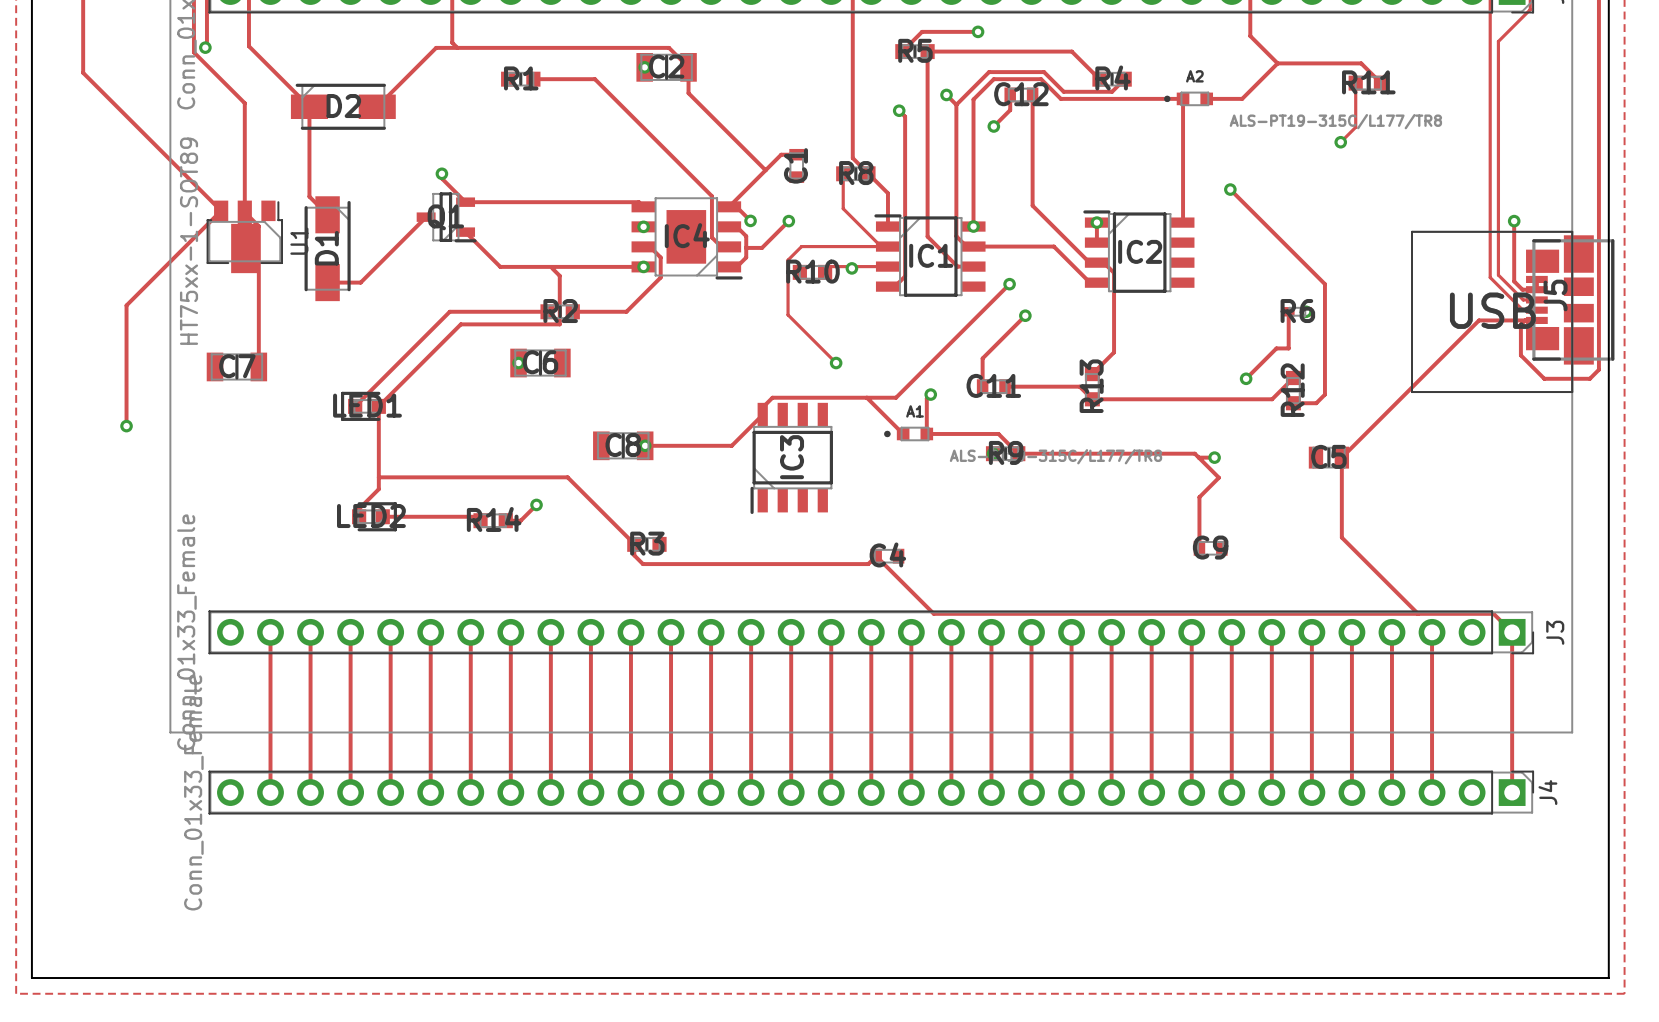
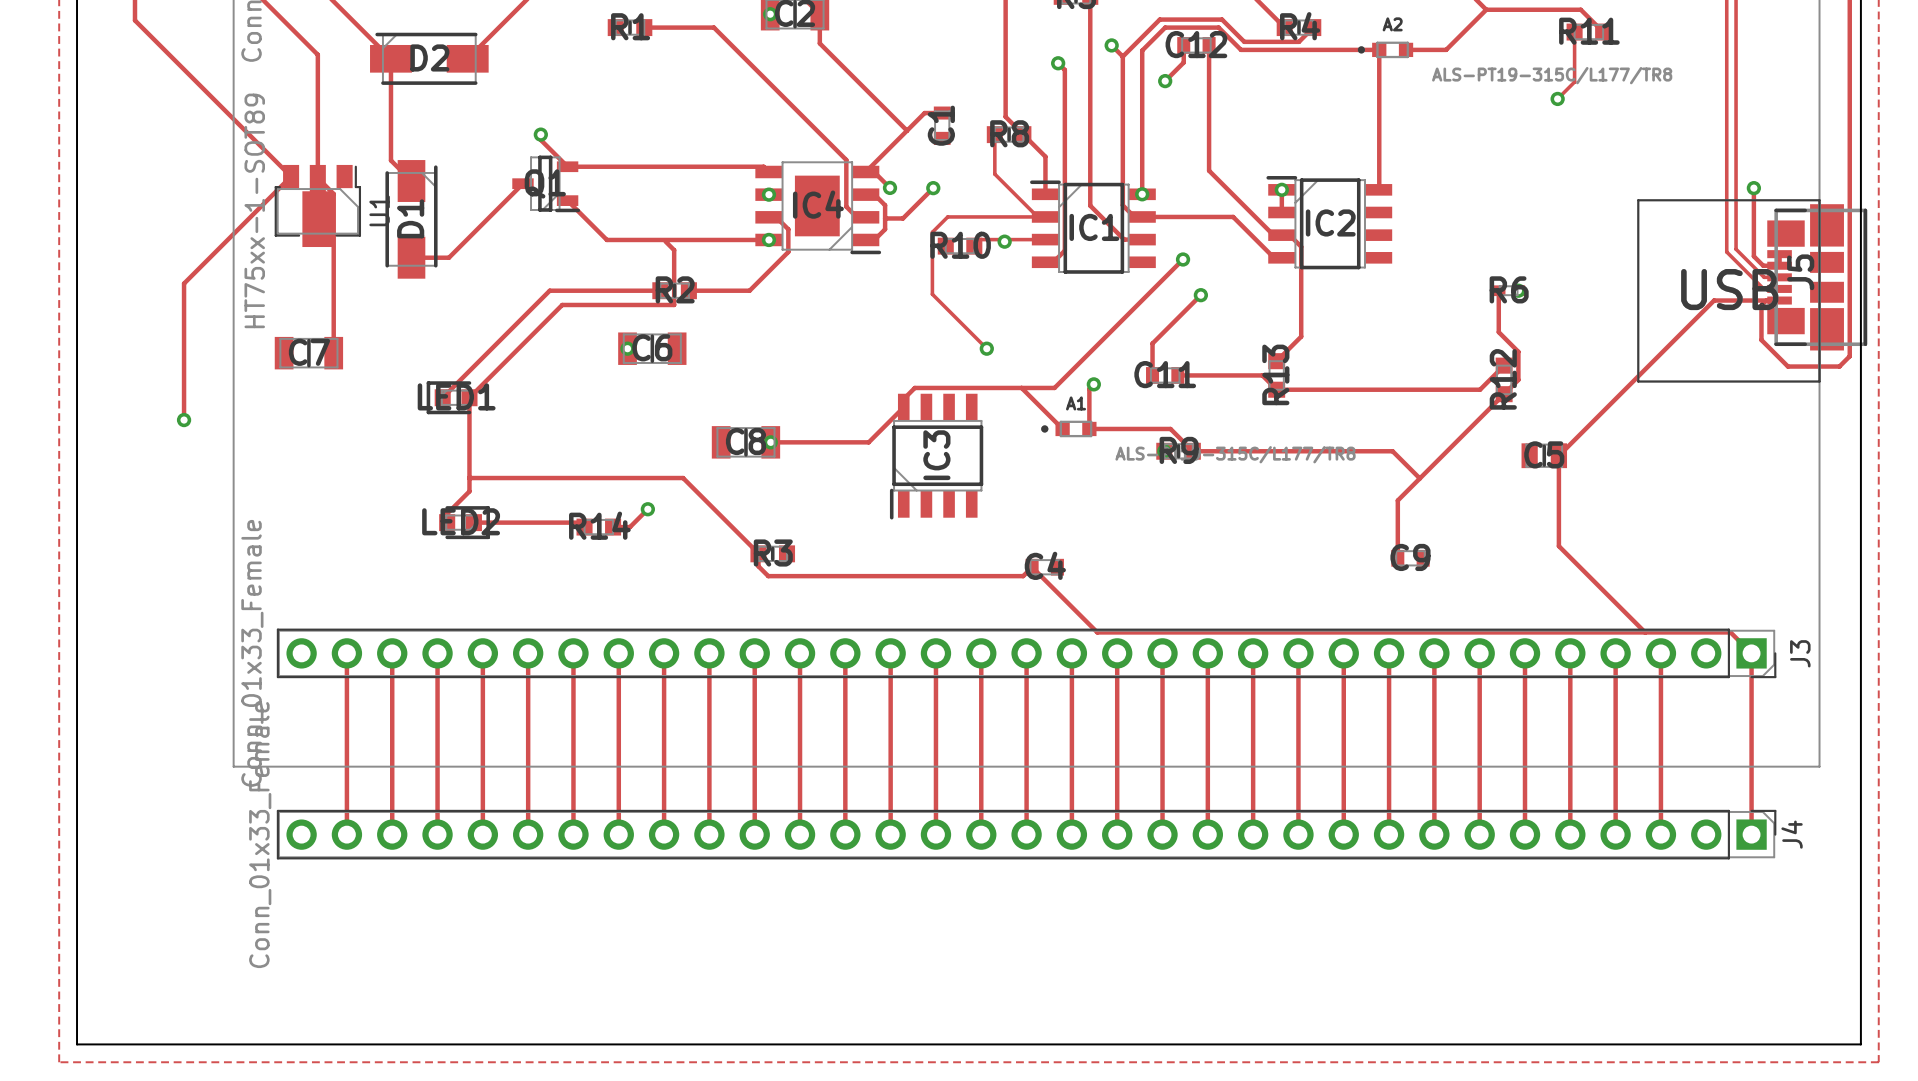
track: (1230, 189) (1324, 284) (1324, 394) (1316, 403) (1293, 403) -> none
via: (1230, 189) -> none
track: (1288, 348) (1276, 348) (1246, 378) -> (1498, 332) (1518, 351) (1518, 379) (1419, 478)
via: (1246, 378) -> none
track: (1198, 457) (1214, 457) -> none
via: (1214, 457) -> none

